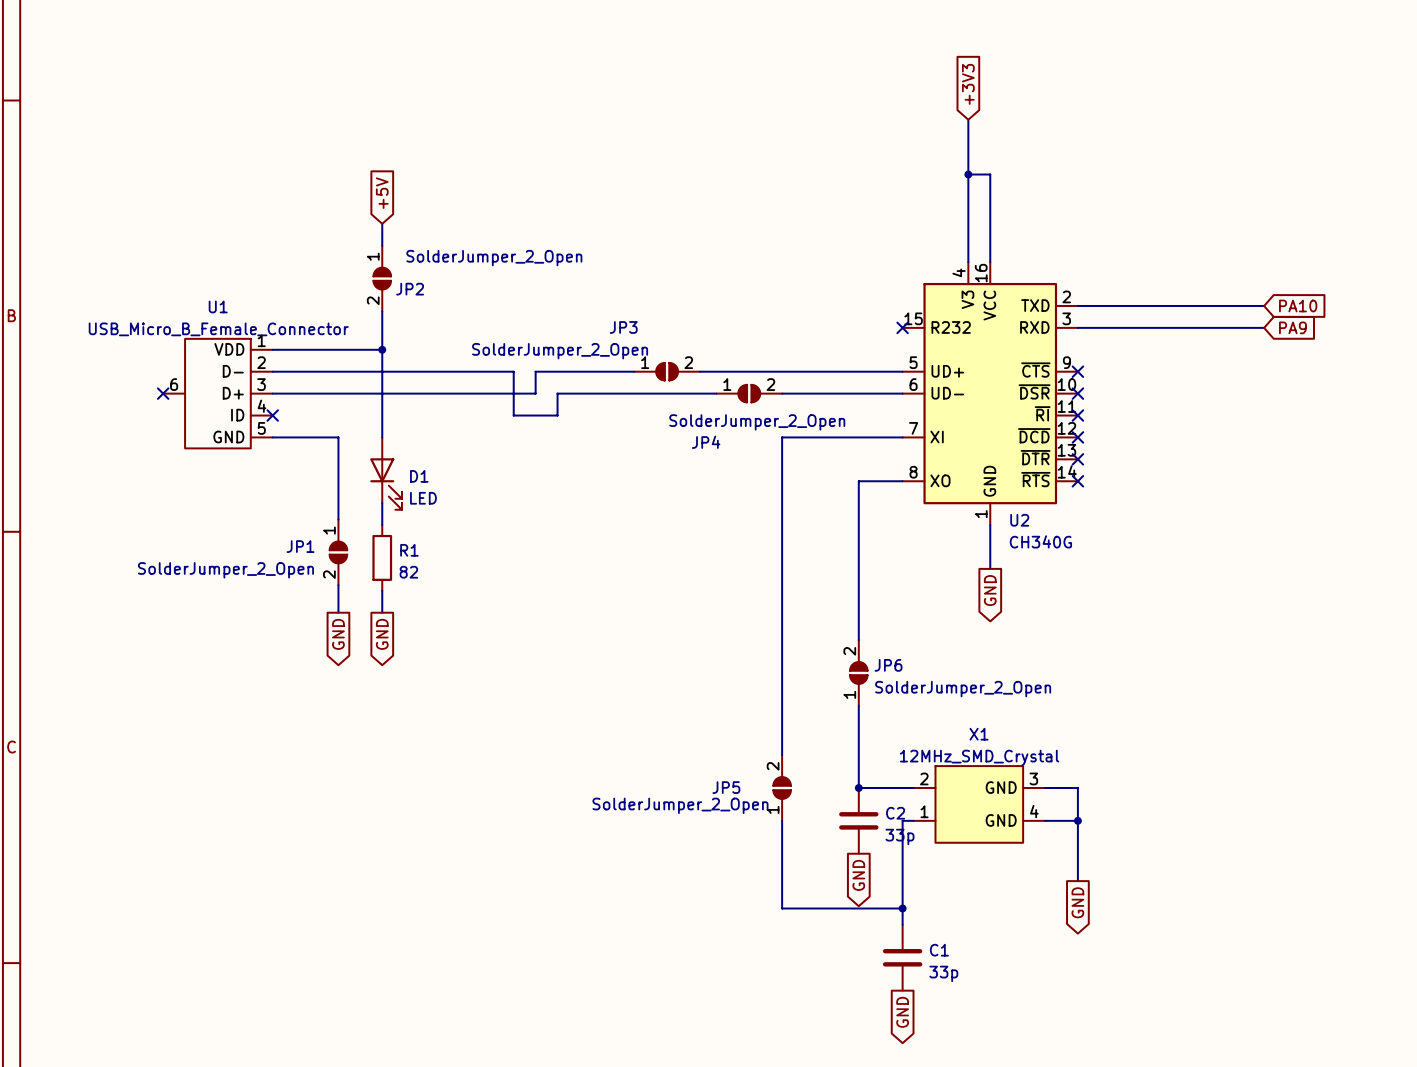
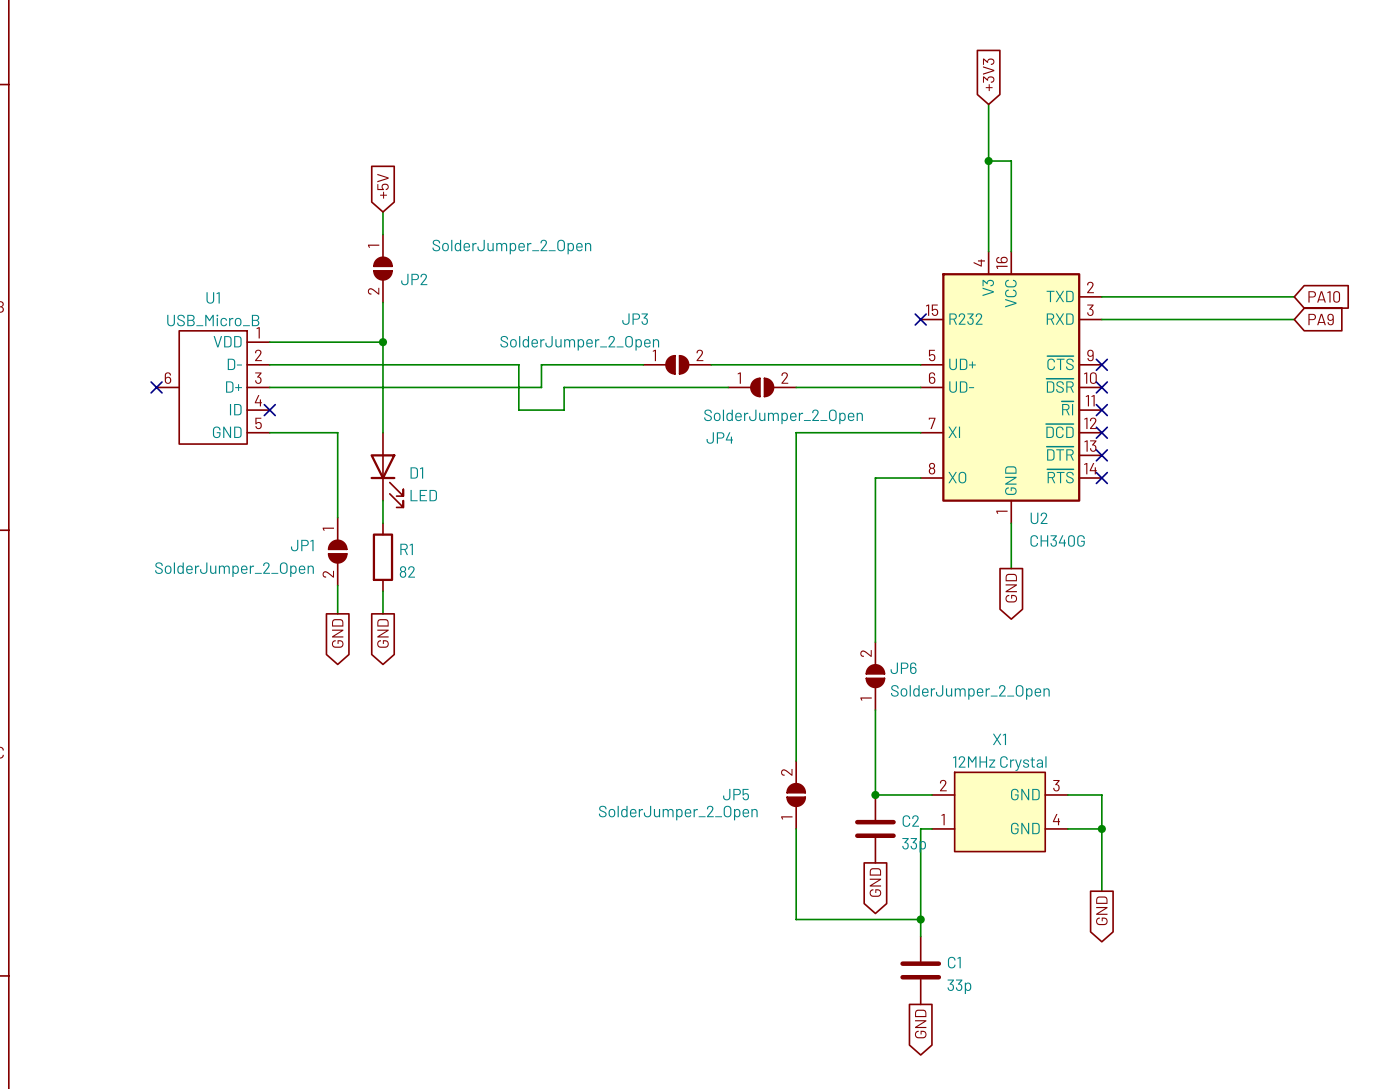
U1 value: USB_Micro_B_Female_Connector (218, 329) -> USB_Micro_B (213, 320)
X1 value: 12MHz_SMD_Crystal (979, 757) -> 12MHz Crystal (999, 763)

